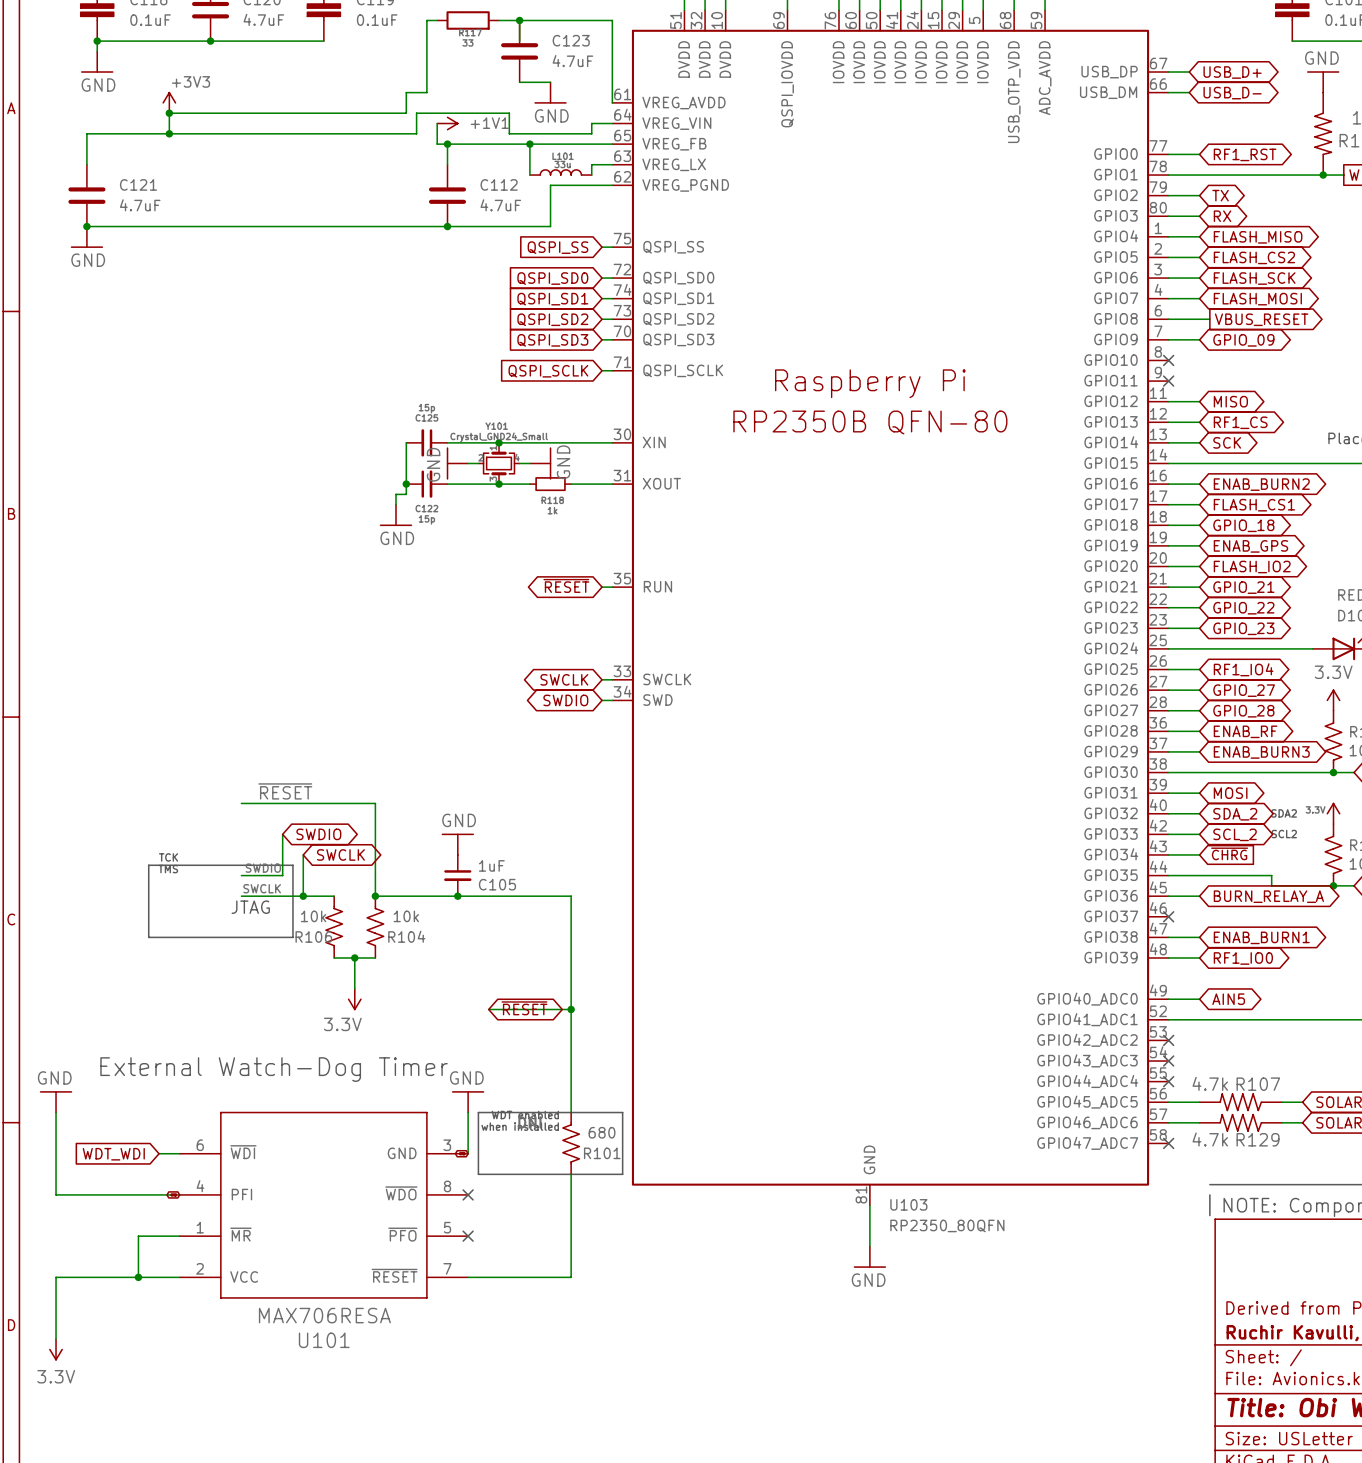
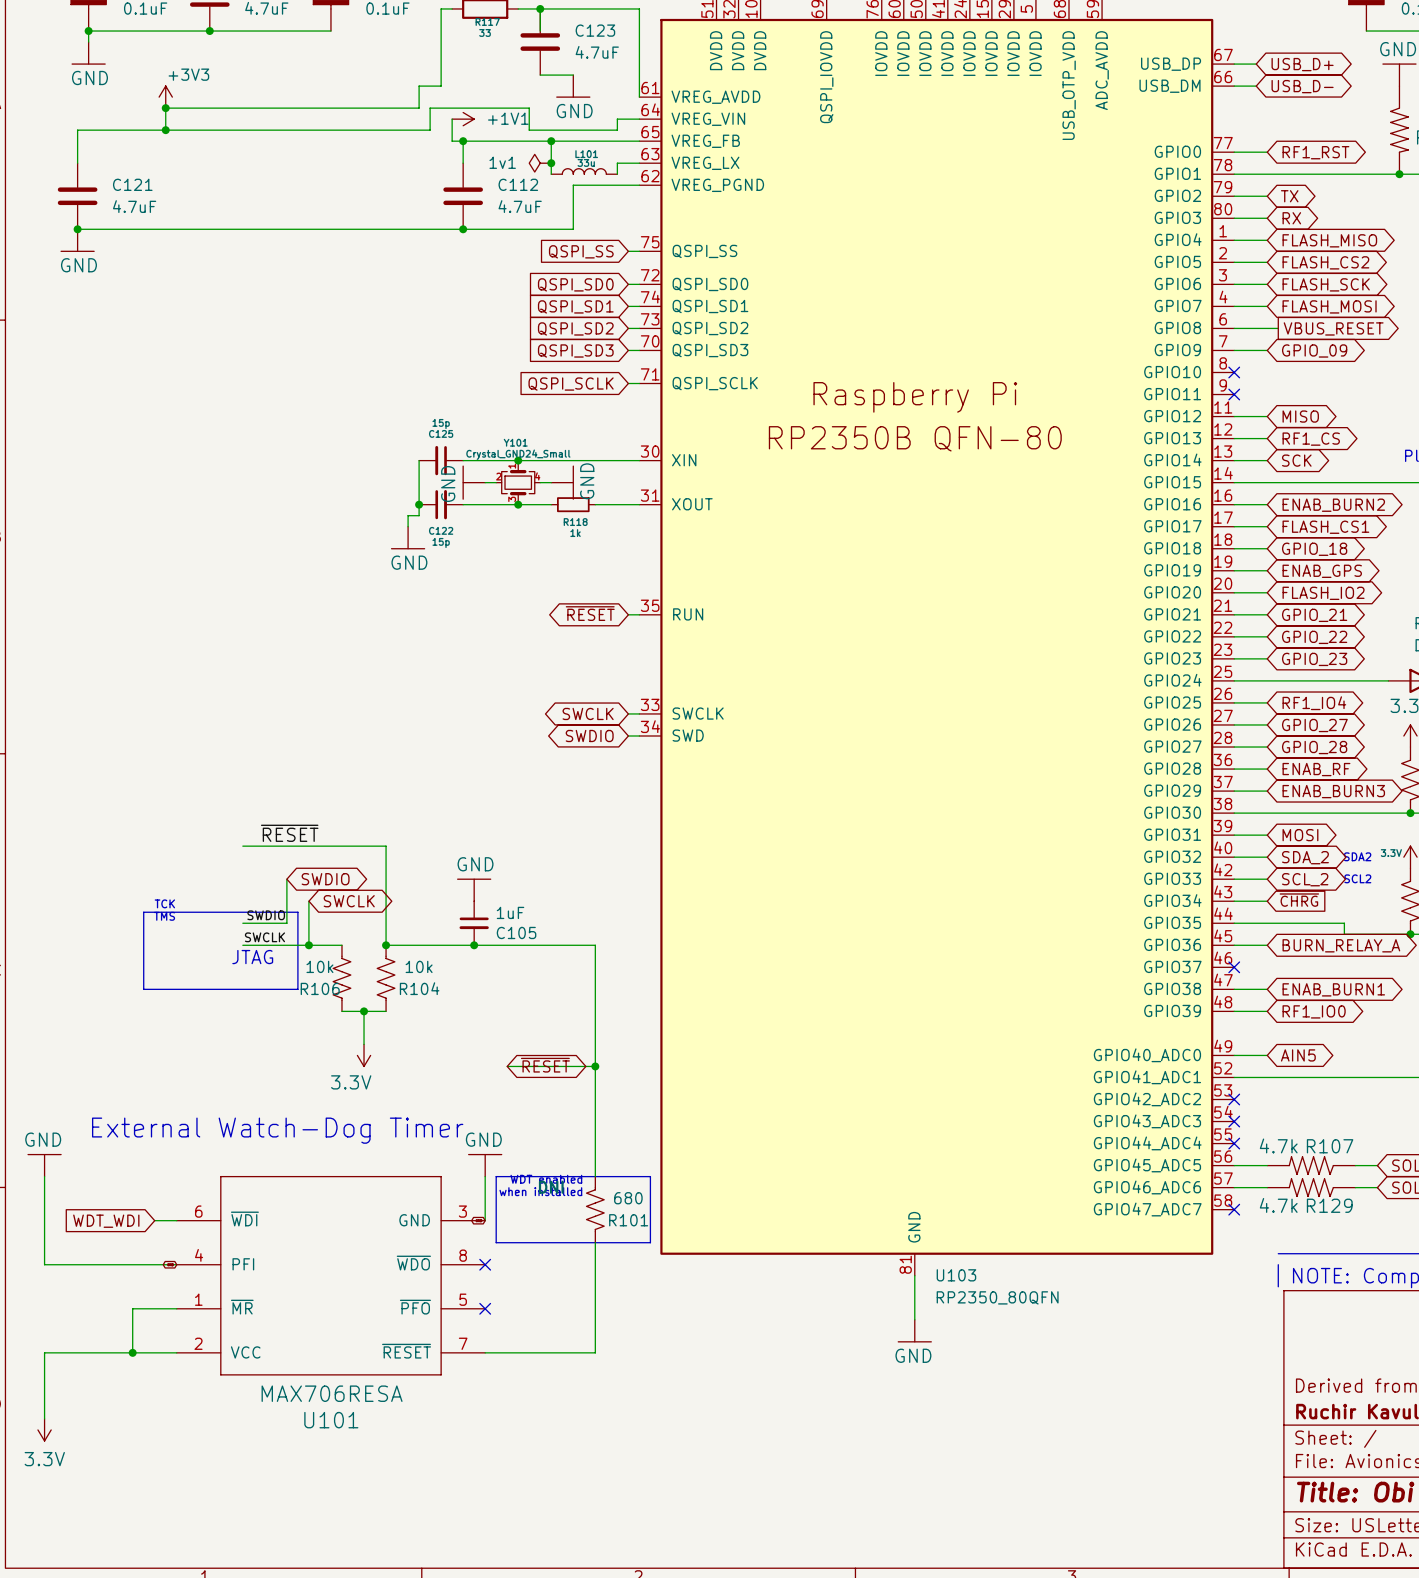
power symbol: none -> 1v1 (540, 163)
junction: none -> (551, 163)

